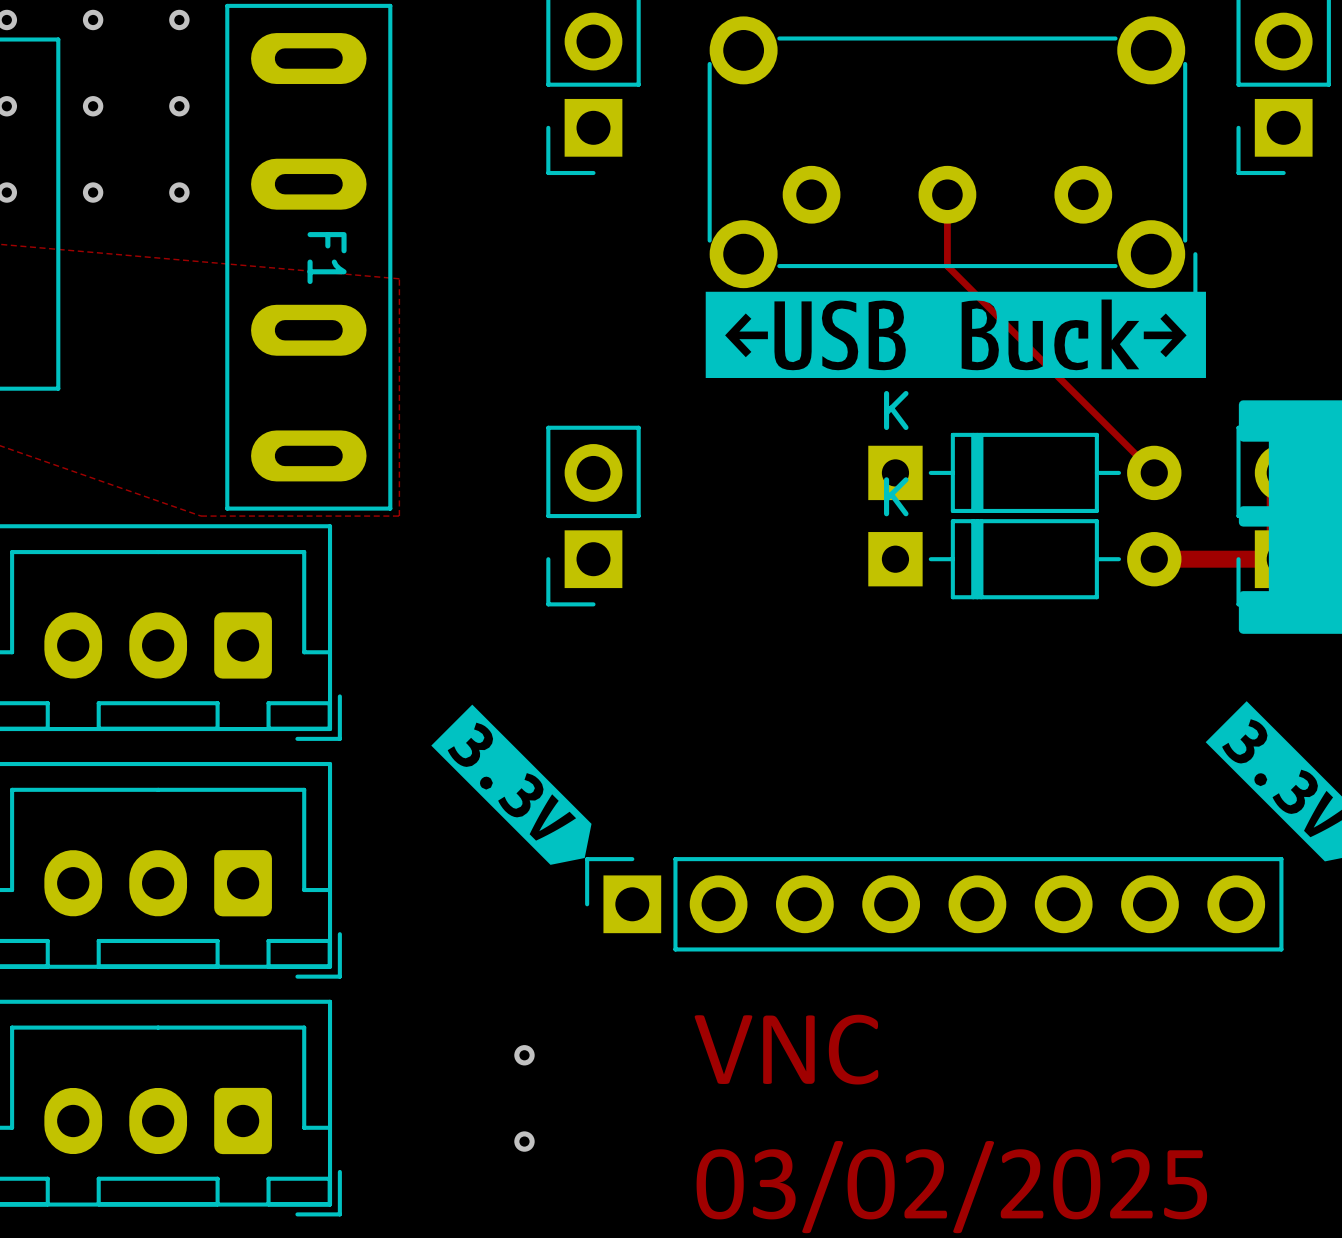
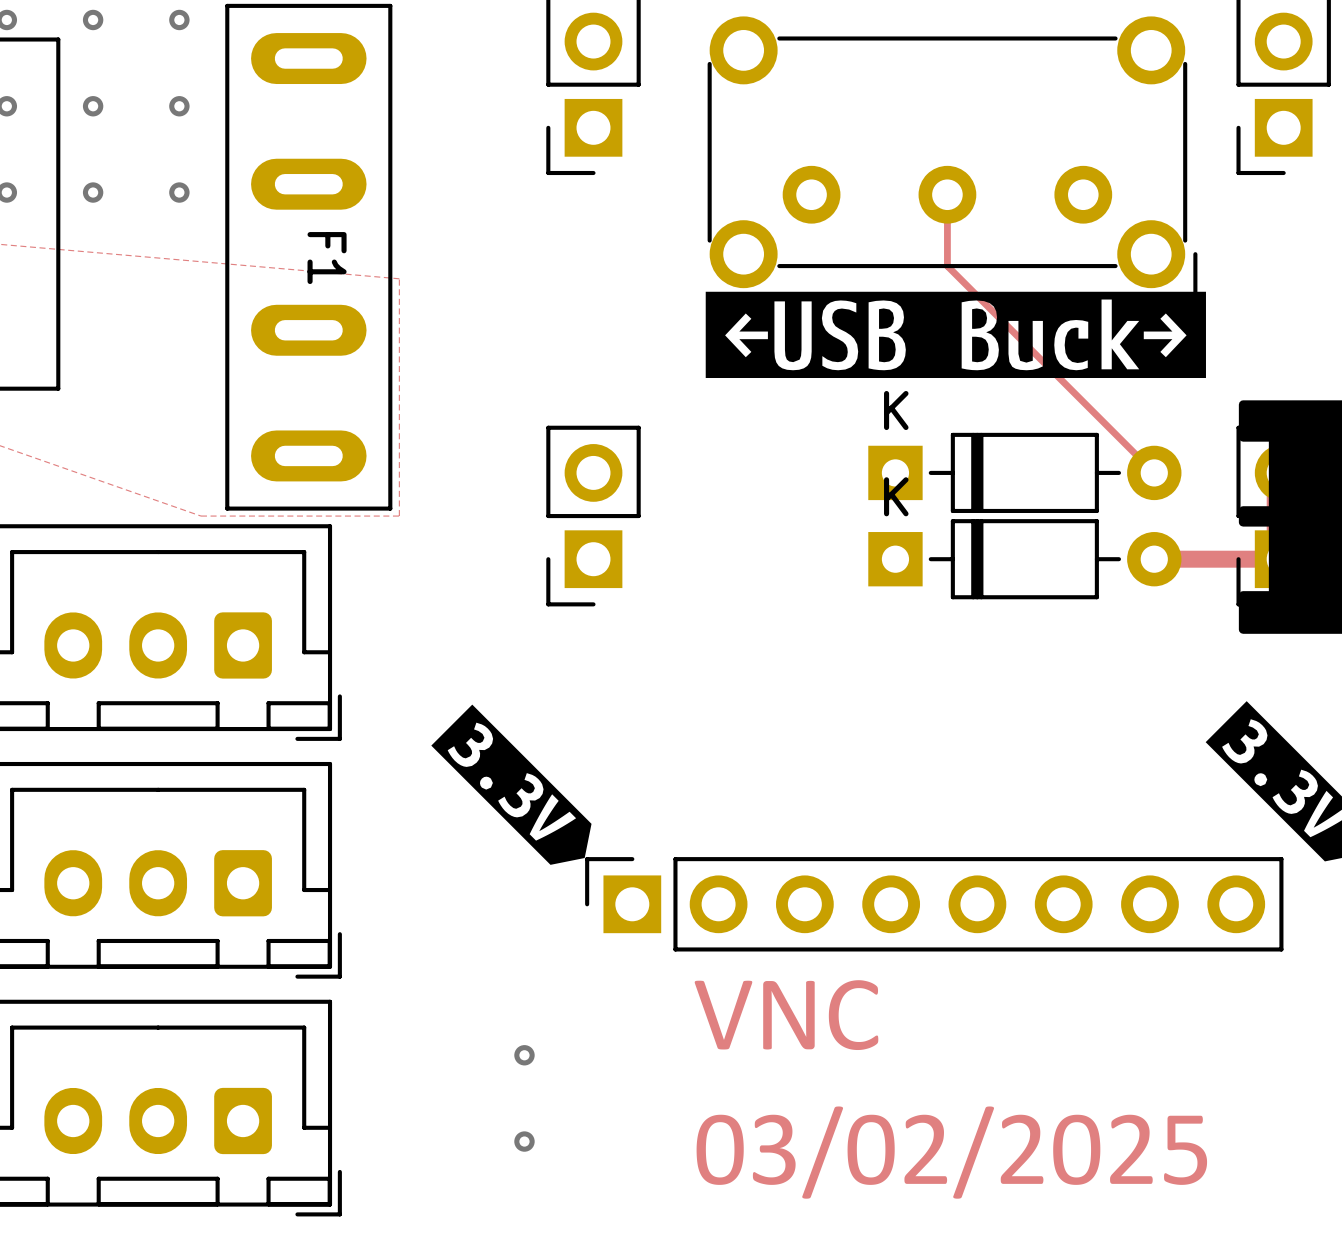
drawing position: (723, 1049) -> (723, 1015)
drawing position: (788, 1049) -> (788, 1015)
drawing position: (853, 1049) -> (853, 1015)
drawing position: (925, 1183) -> (925, 1149)
drawing position: (1022, 1183) -> (1022, 1149)
drawing position: (1131, 1183) -> (1131, 1149)
drawing position: (720, 1184) -> (720, 1149)
drawing position: (774, 1184) -> (774, 1149)
drawing position: (871, 1184) -> (871, 1149)
drawing position: (1076, 1184) -> (1076, 1149)
drawing position: (1185, 1184) -> (1185, 1150)
drawing position: (822, 1187) -> (822, 1152)
drawing position: (973, 1187) -> (973, 1152)

